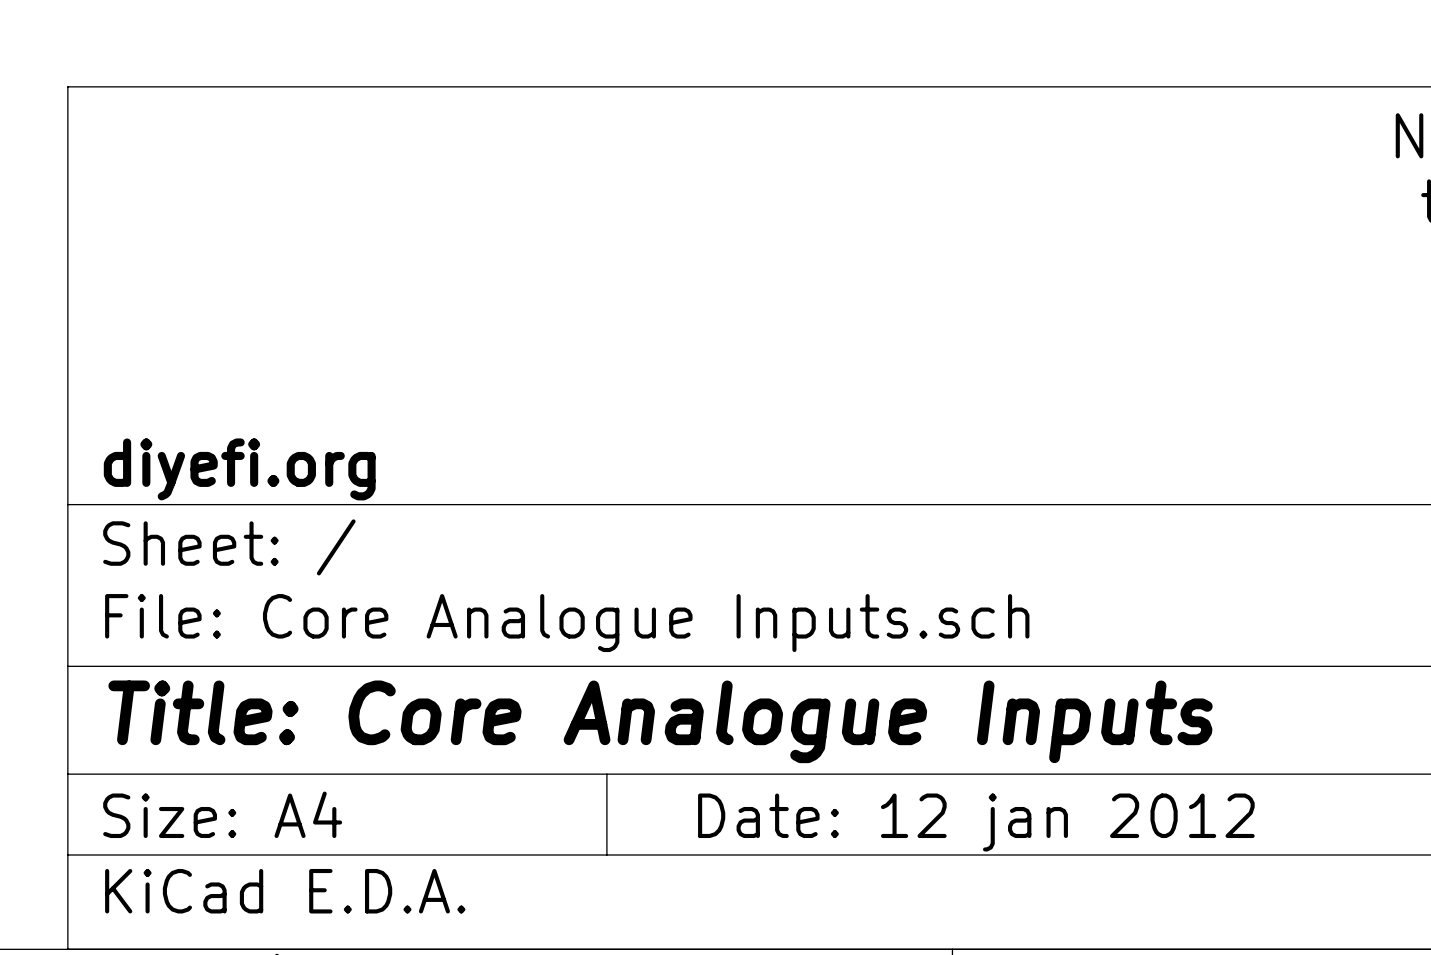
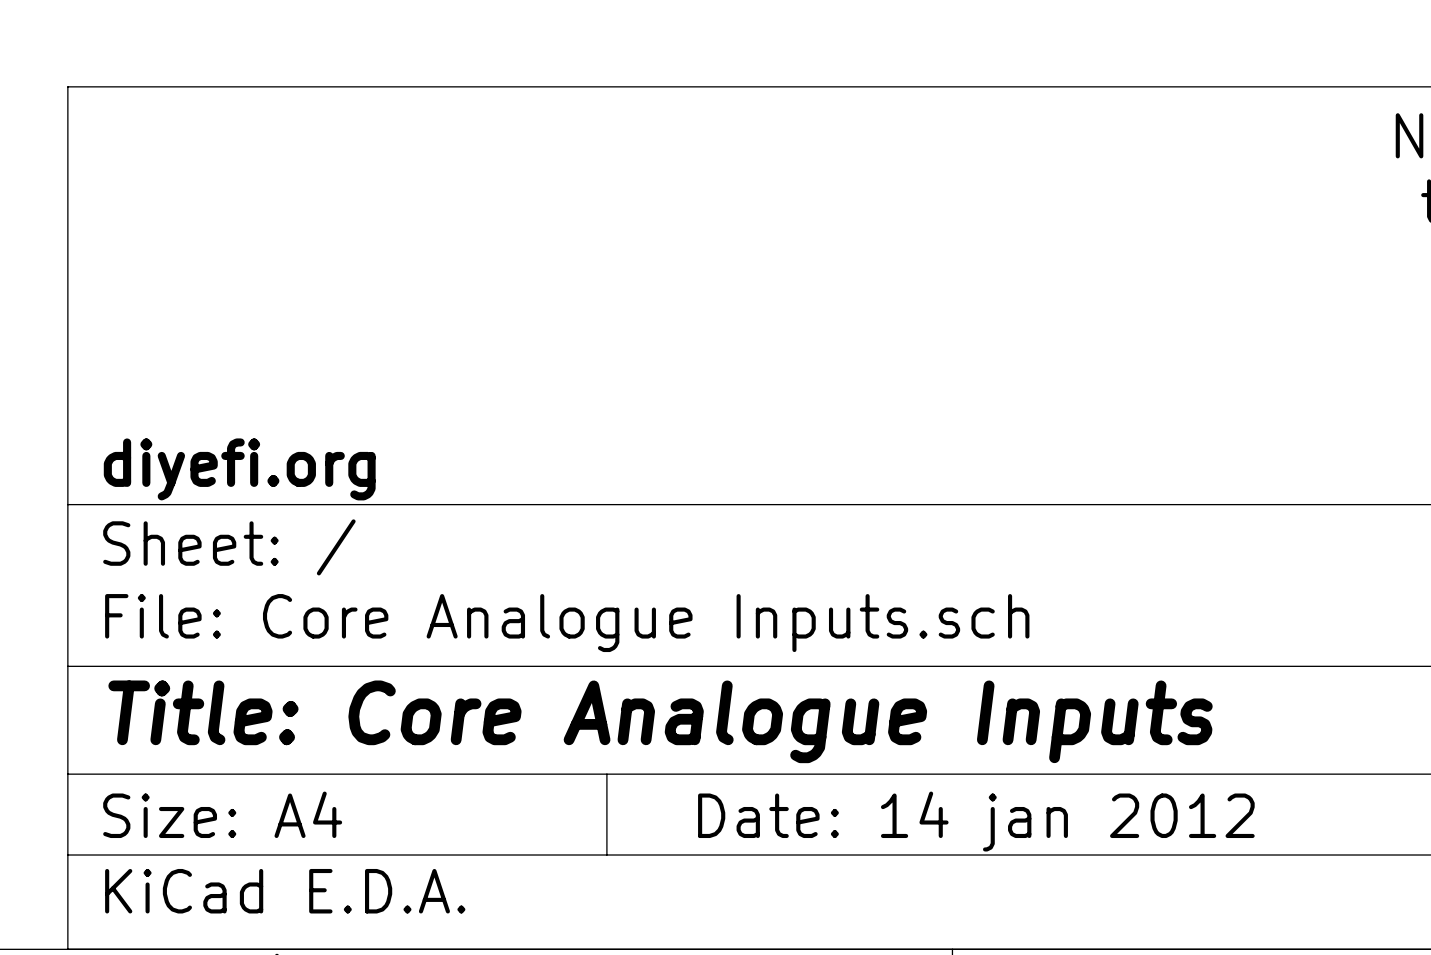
title block: Date: 12 jan 2012 (976, 822) -> Date: 14 jan 2012 (976, 821)

